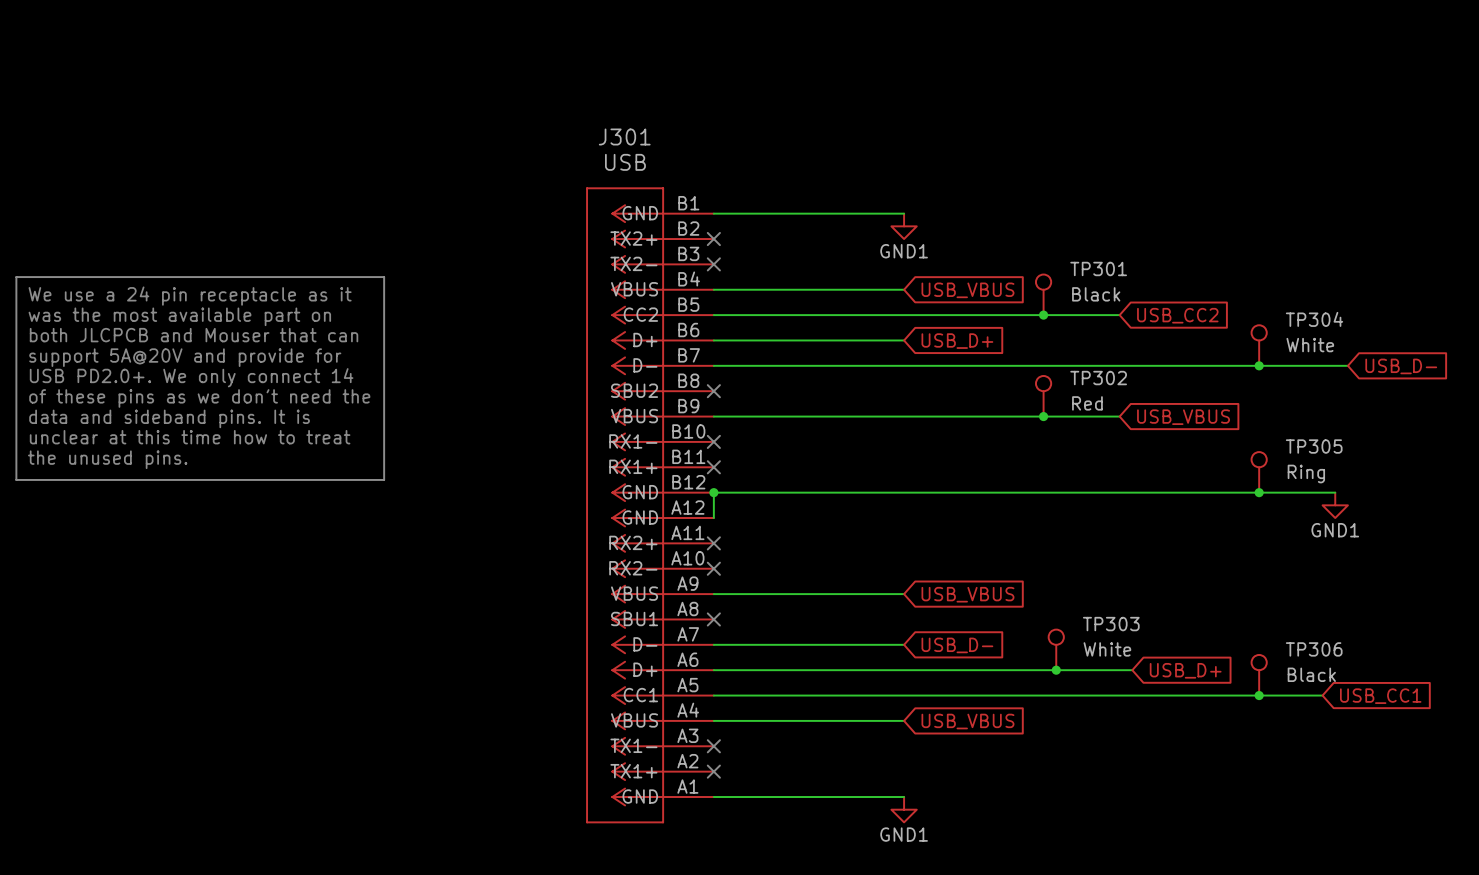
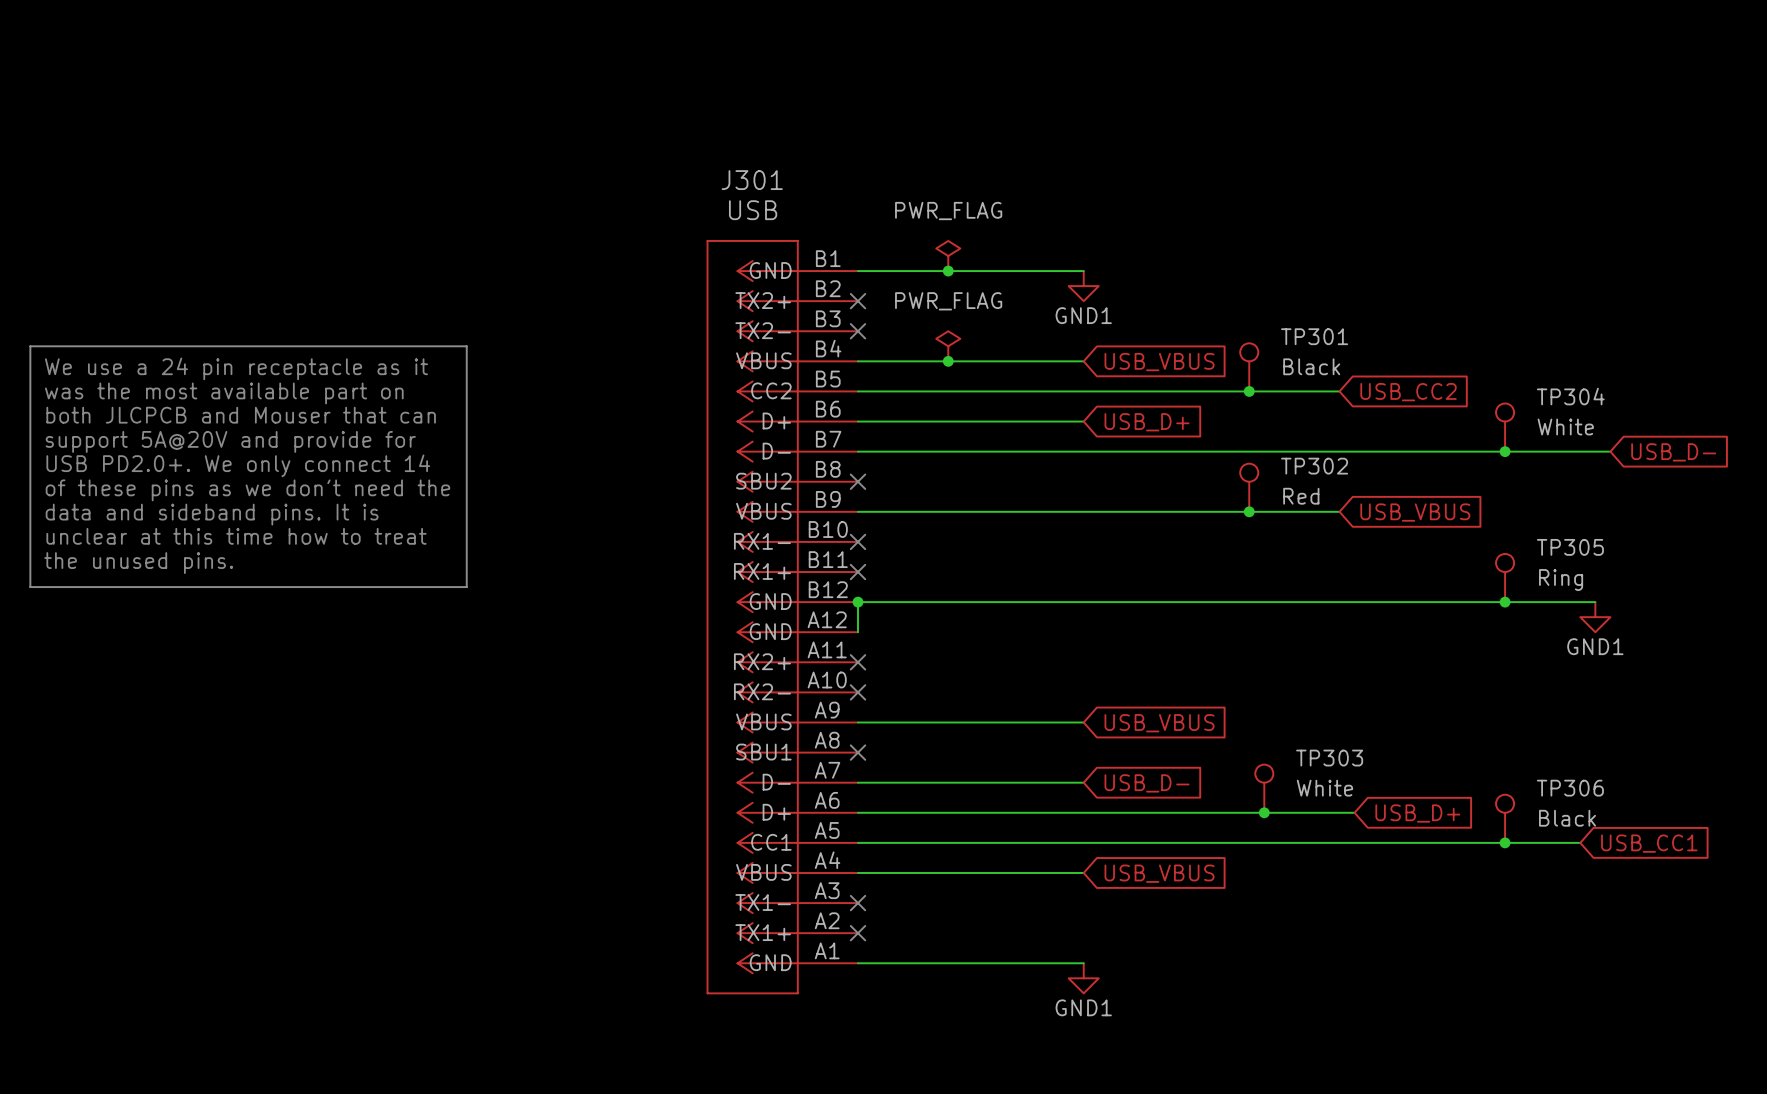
power symbol: none -> PWR_FLAG (948, 256)
junction: none -> (948, 271)
power symbol: none -> PWR_FLAG (948, 346)
junction: none -> (948, 361)

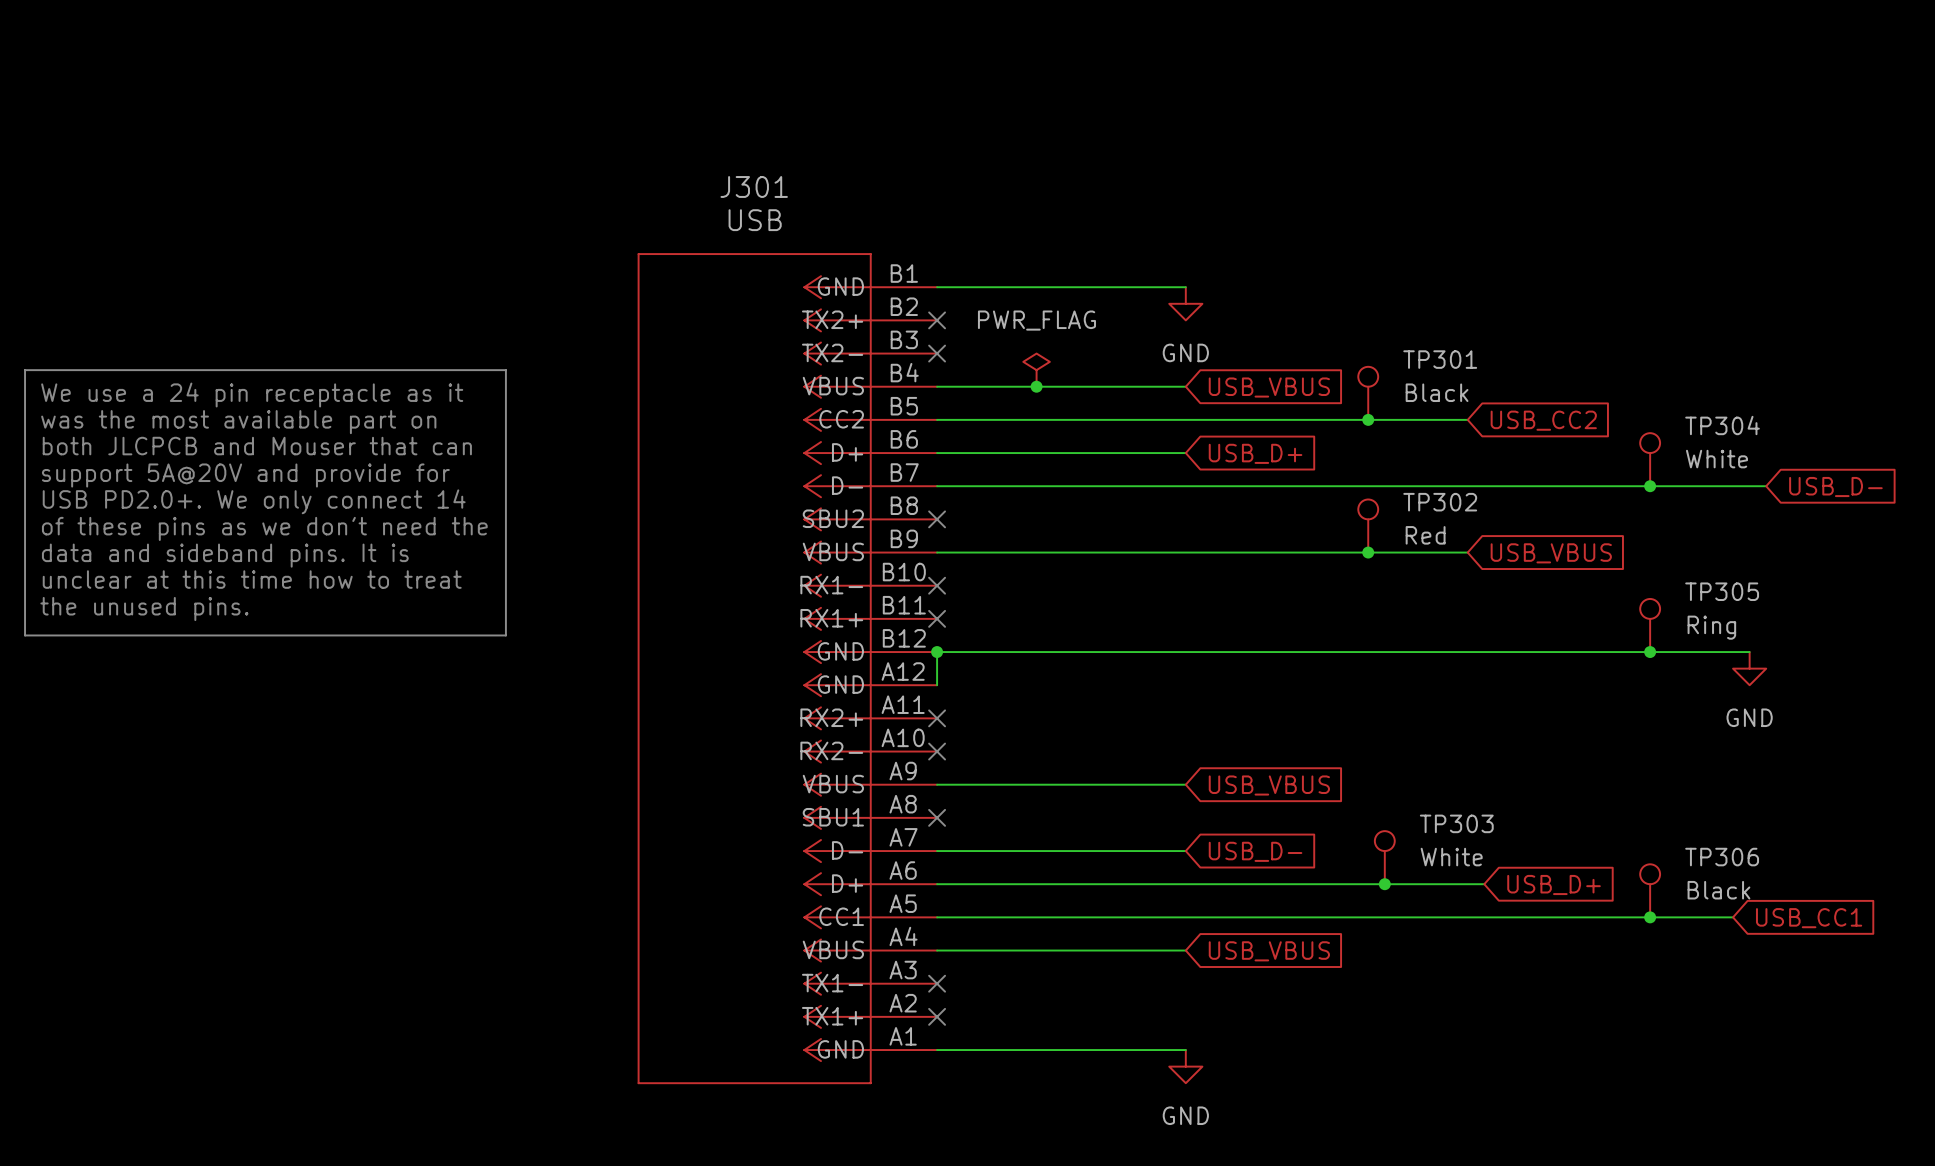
J301 symbol: [706, 240, 859, 995] -> [637, 253, 938, 1085]
power symbol: PWR_FLAG (948, 256) -> none
junction: (948, 271) -> none
power symbol: GND1 (1083, 286) -> GND (1185, 303)
power symbol: GND1 (1595, 617) -> GND (1749, 668)
power symbol: GND1 (1083, 978) -> GND (1185, 1066)

